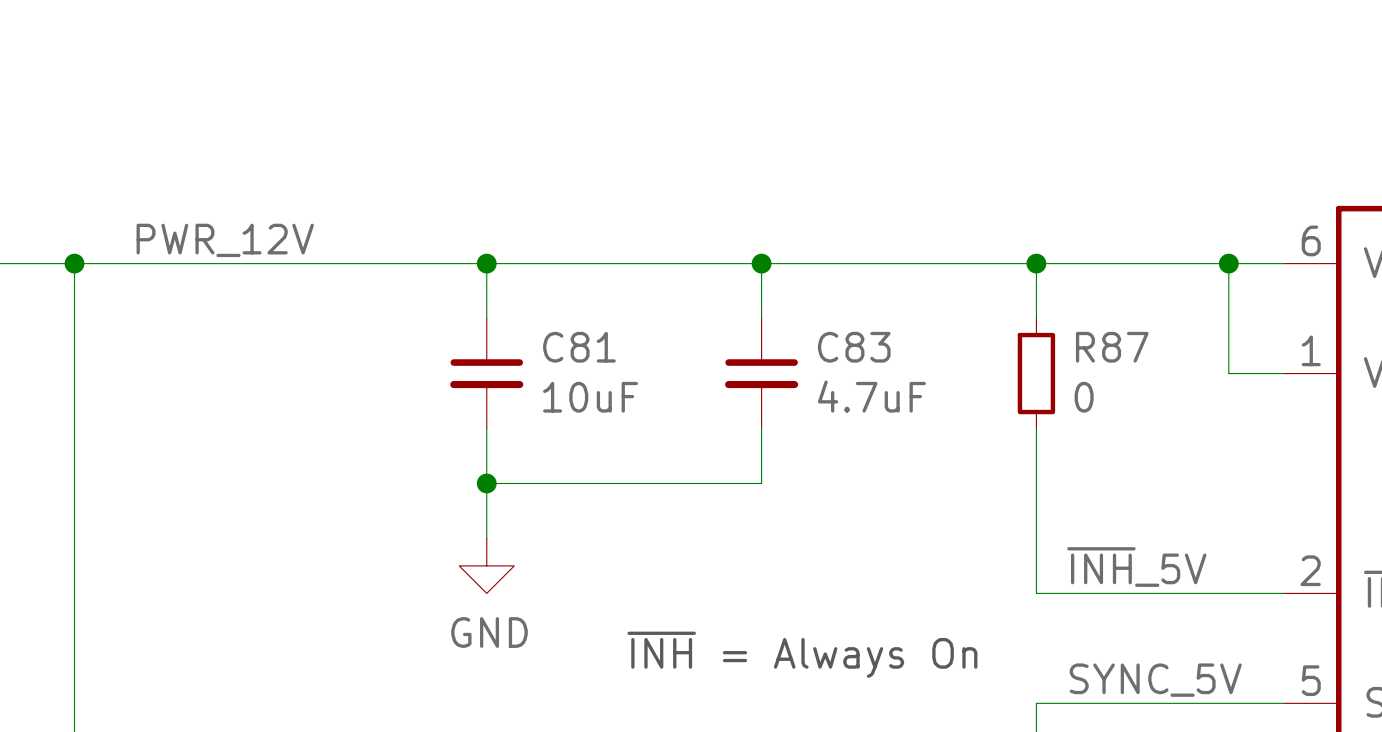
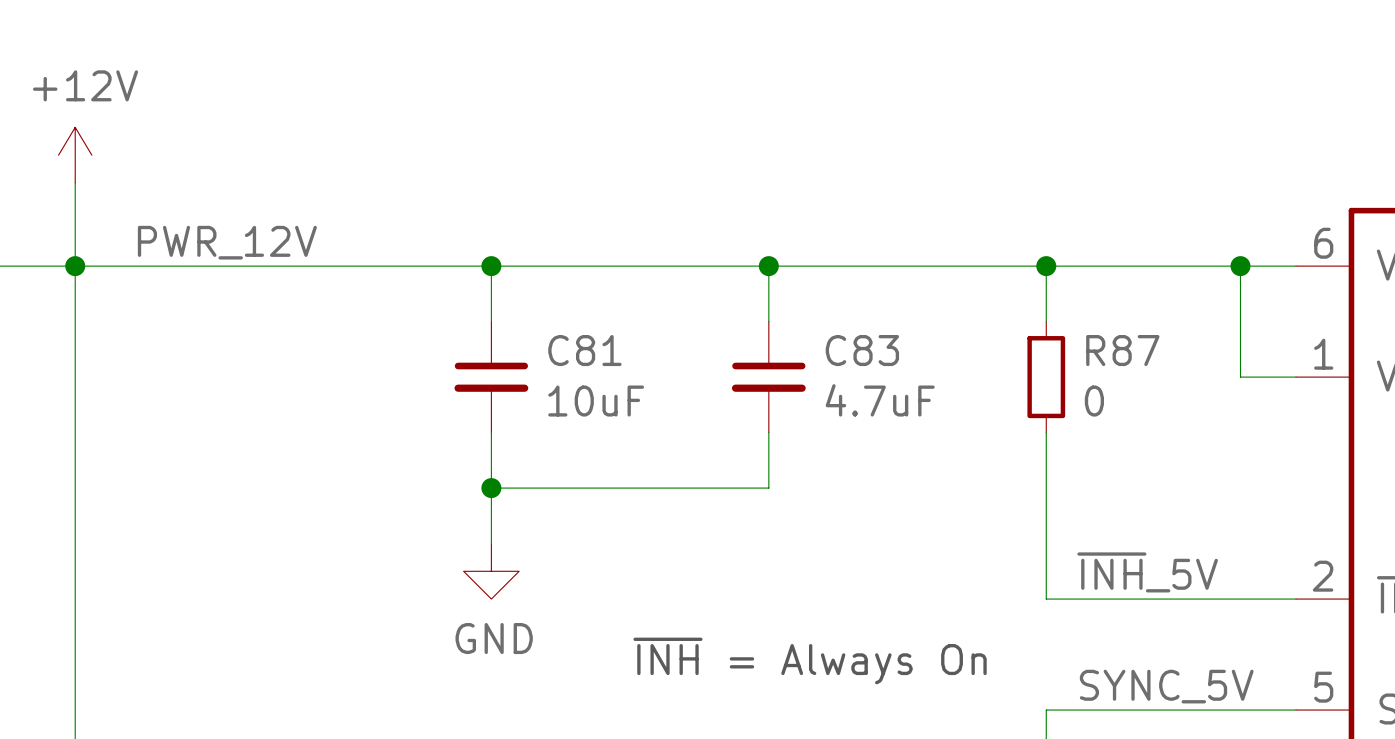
power symbol: none -> +12V (75, 155)
wire: none -> (75, 182) (75, 266)

